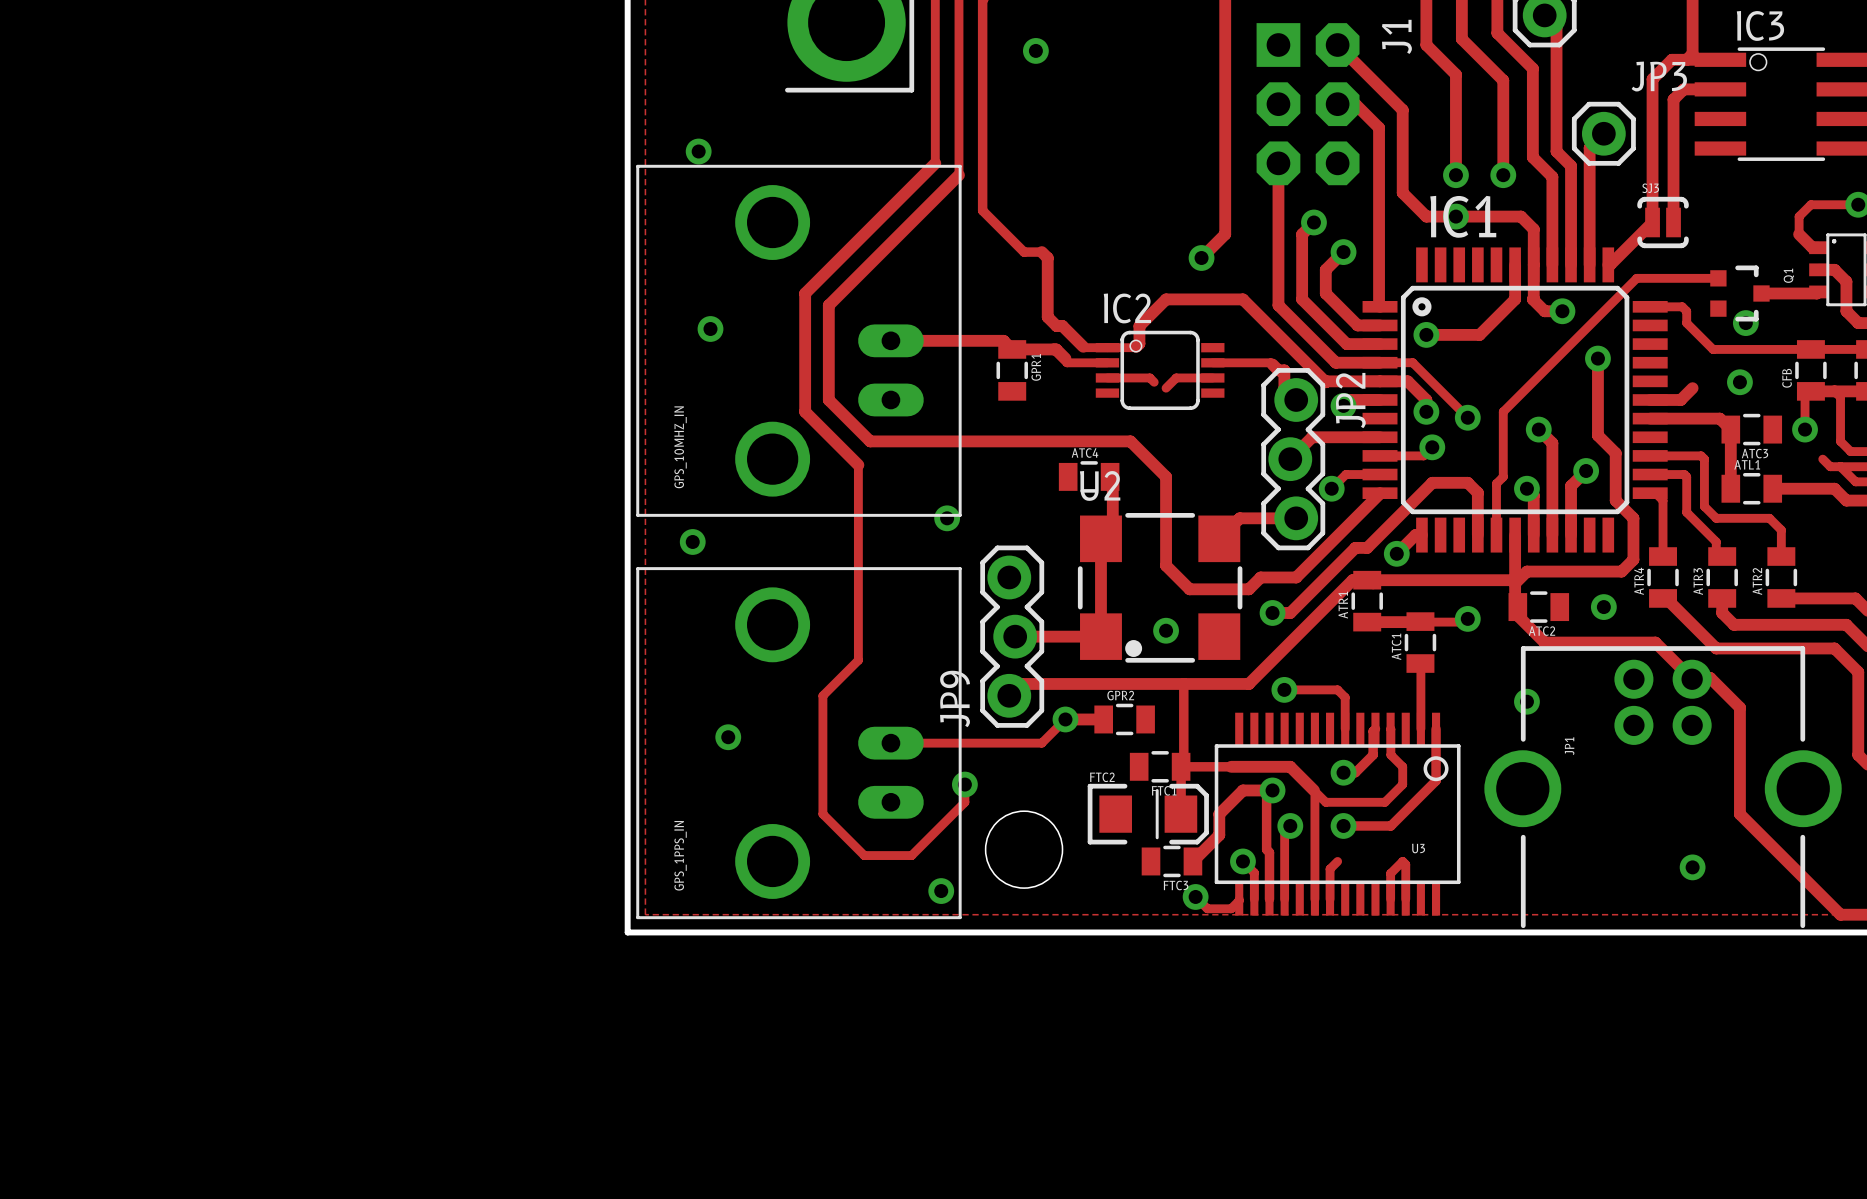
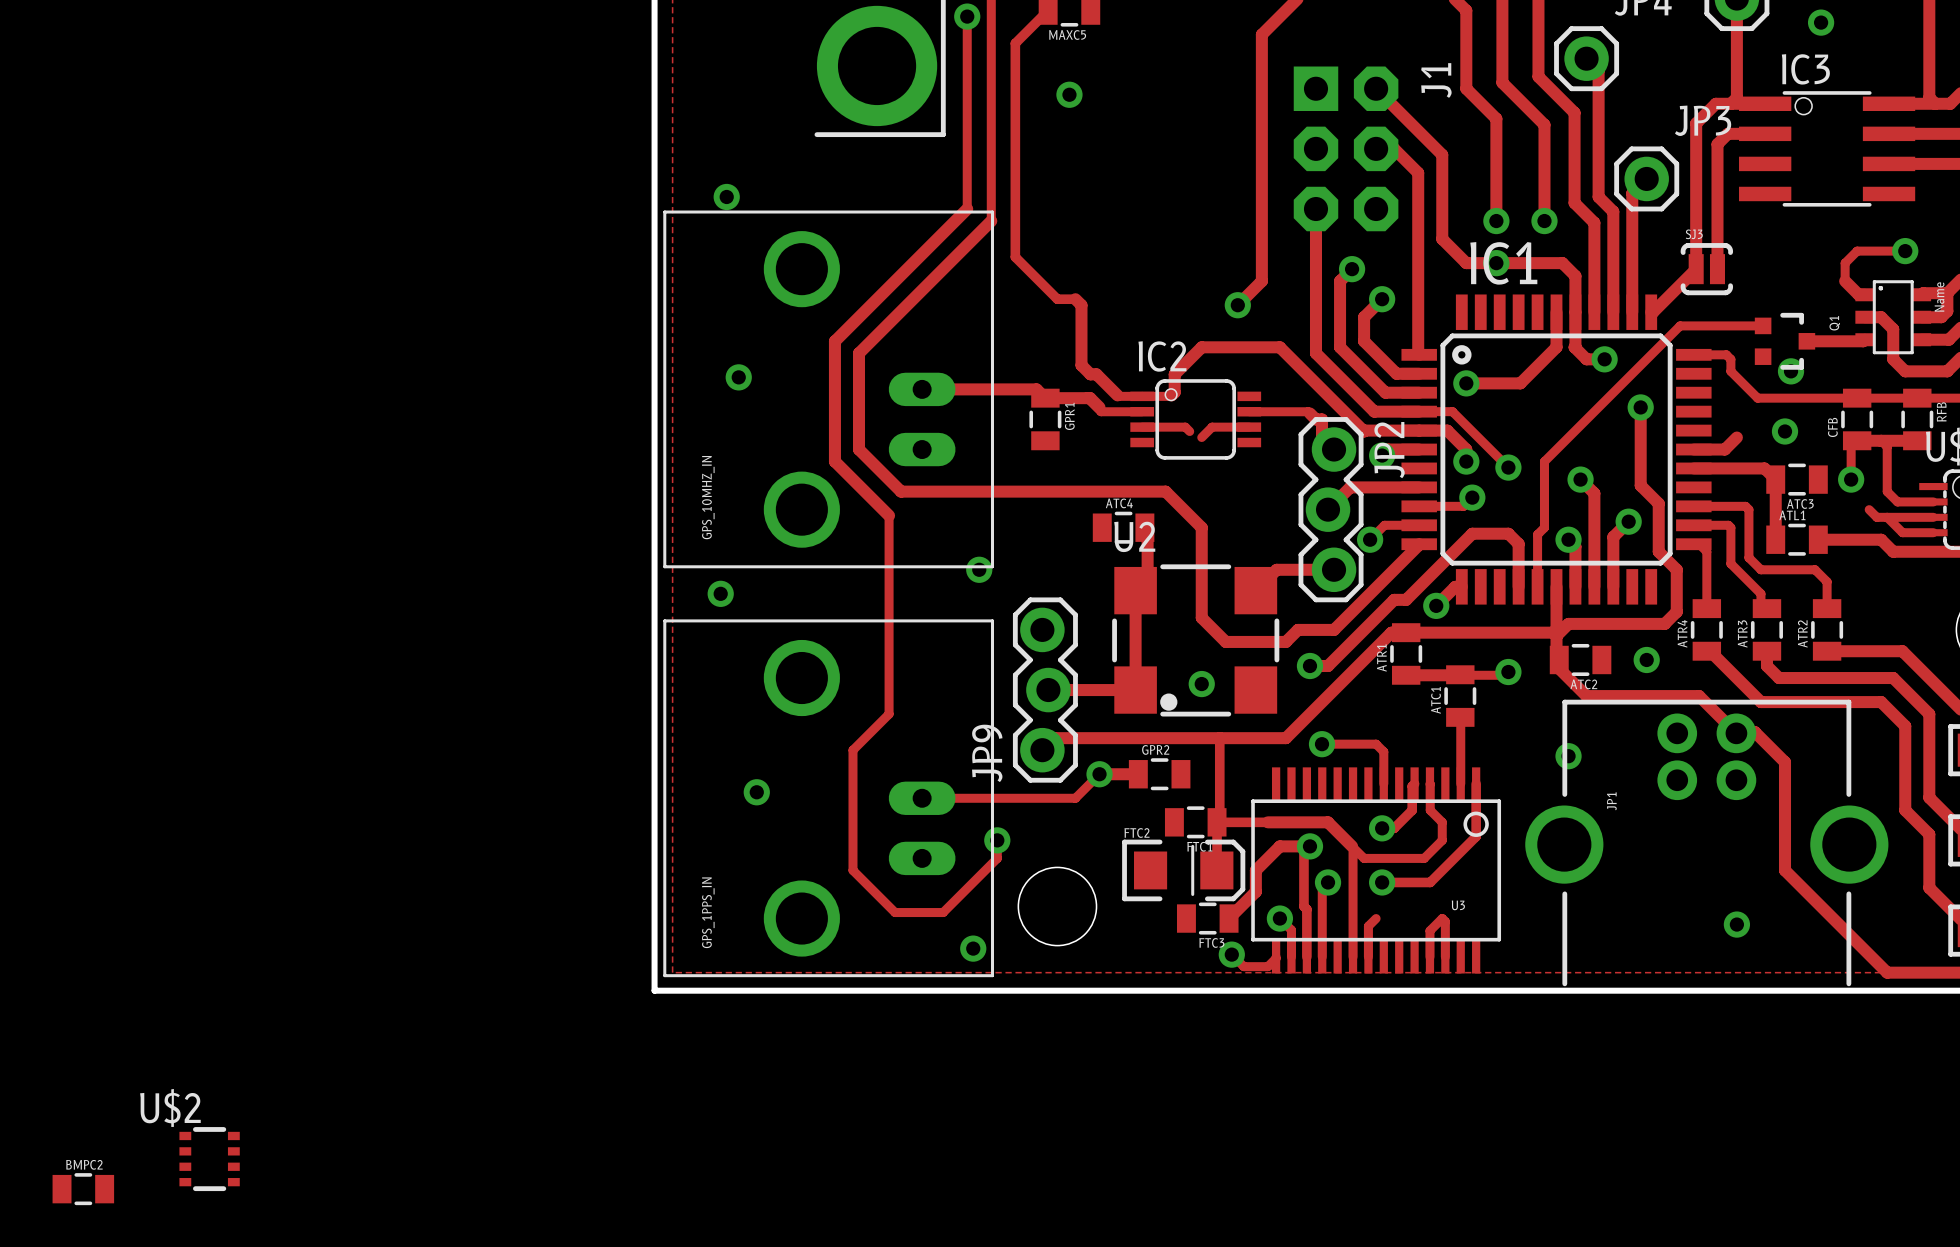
U$2: none -> (209, 1159)
BMPC2: none -> (83, 1189)

